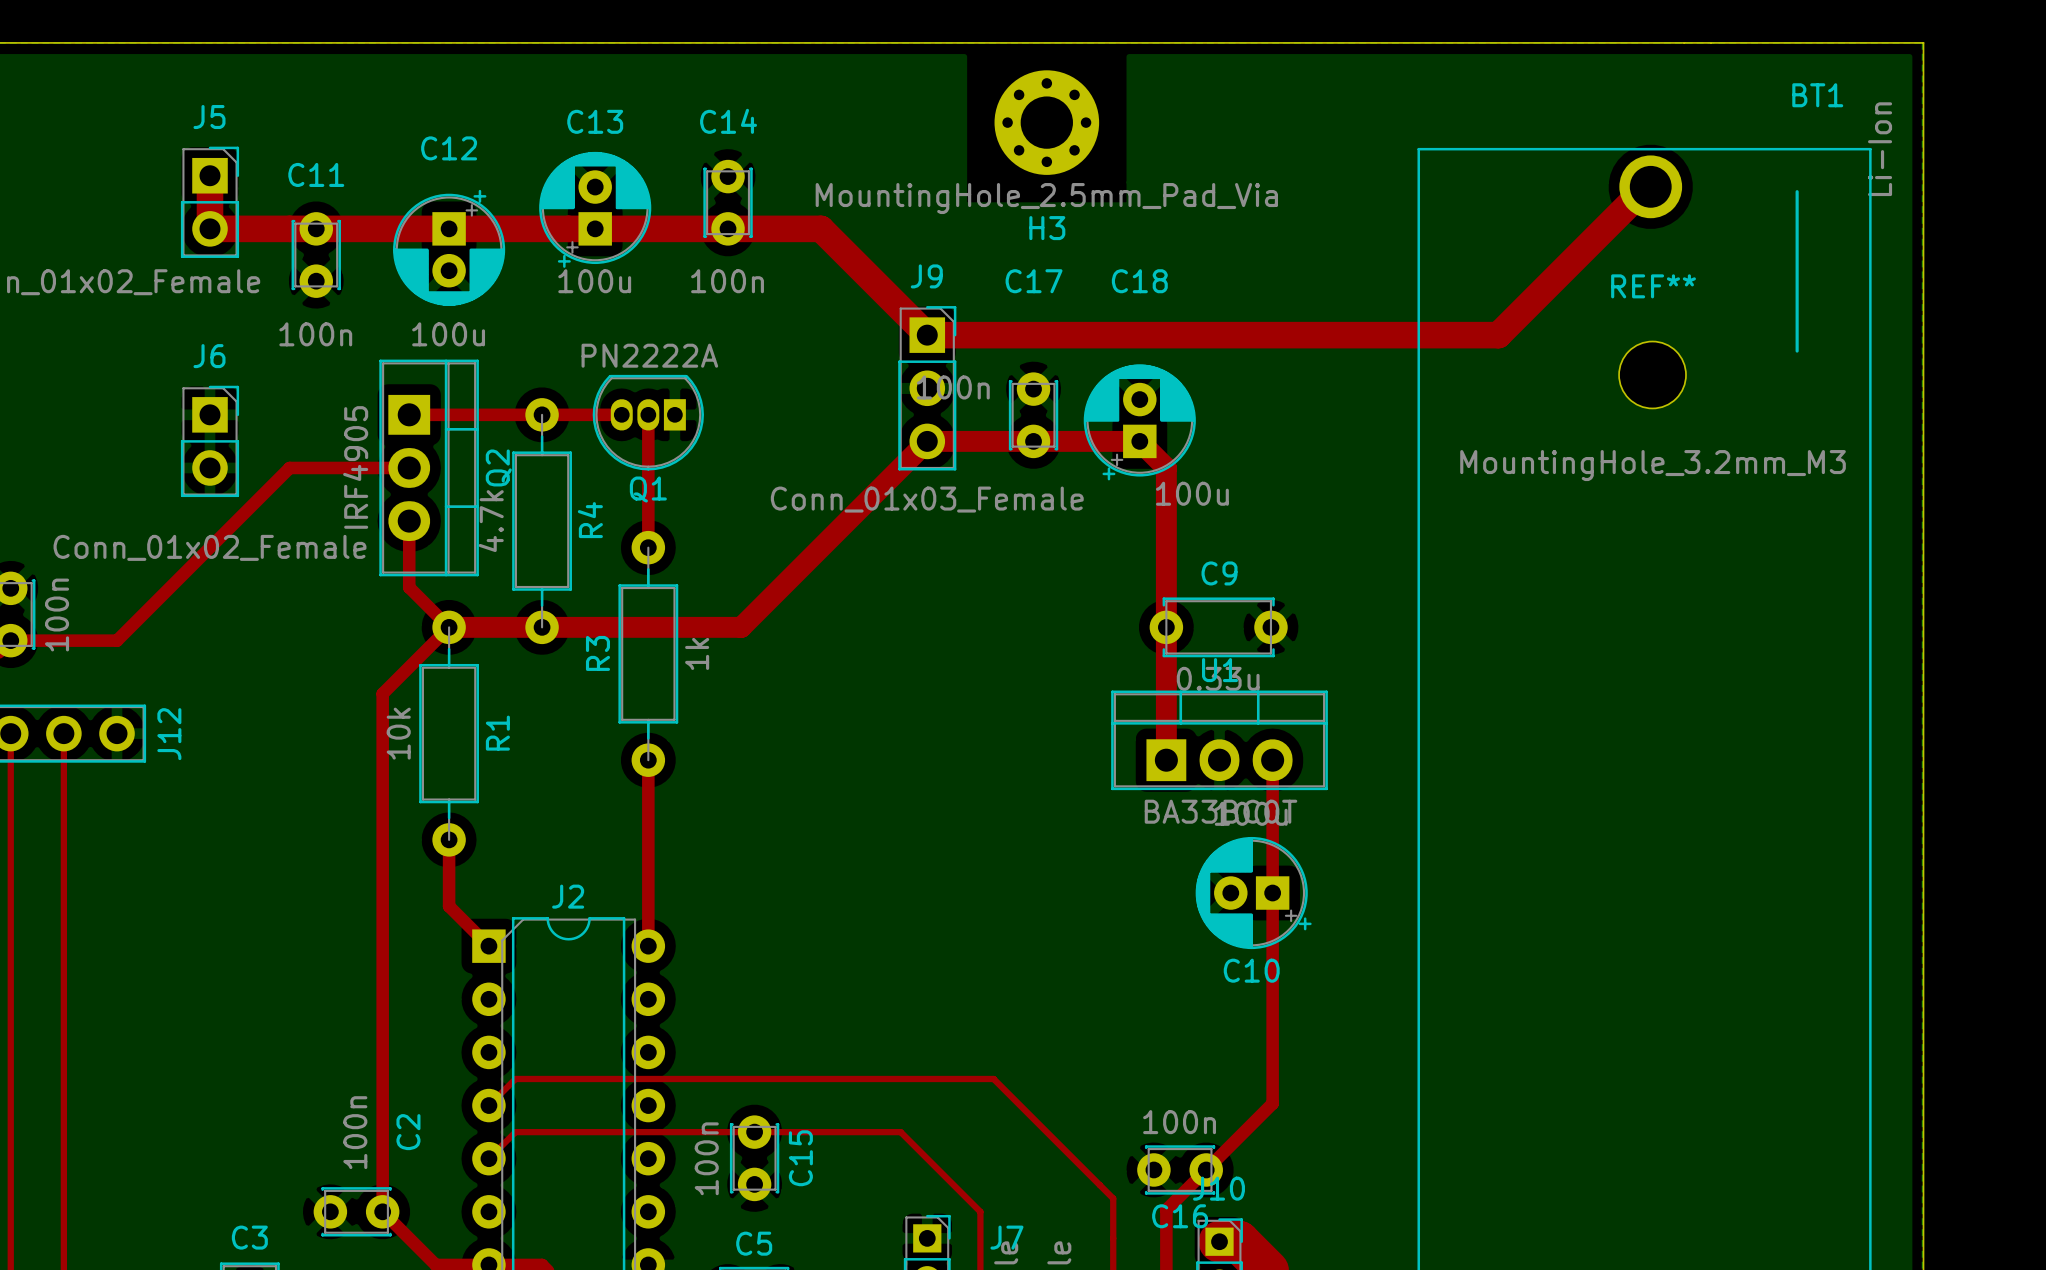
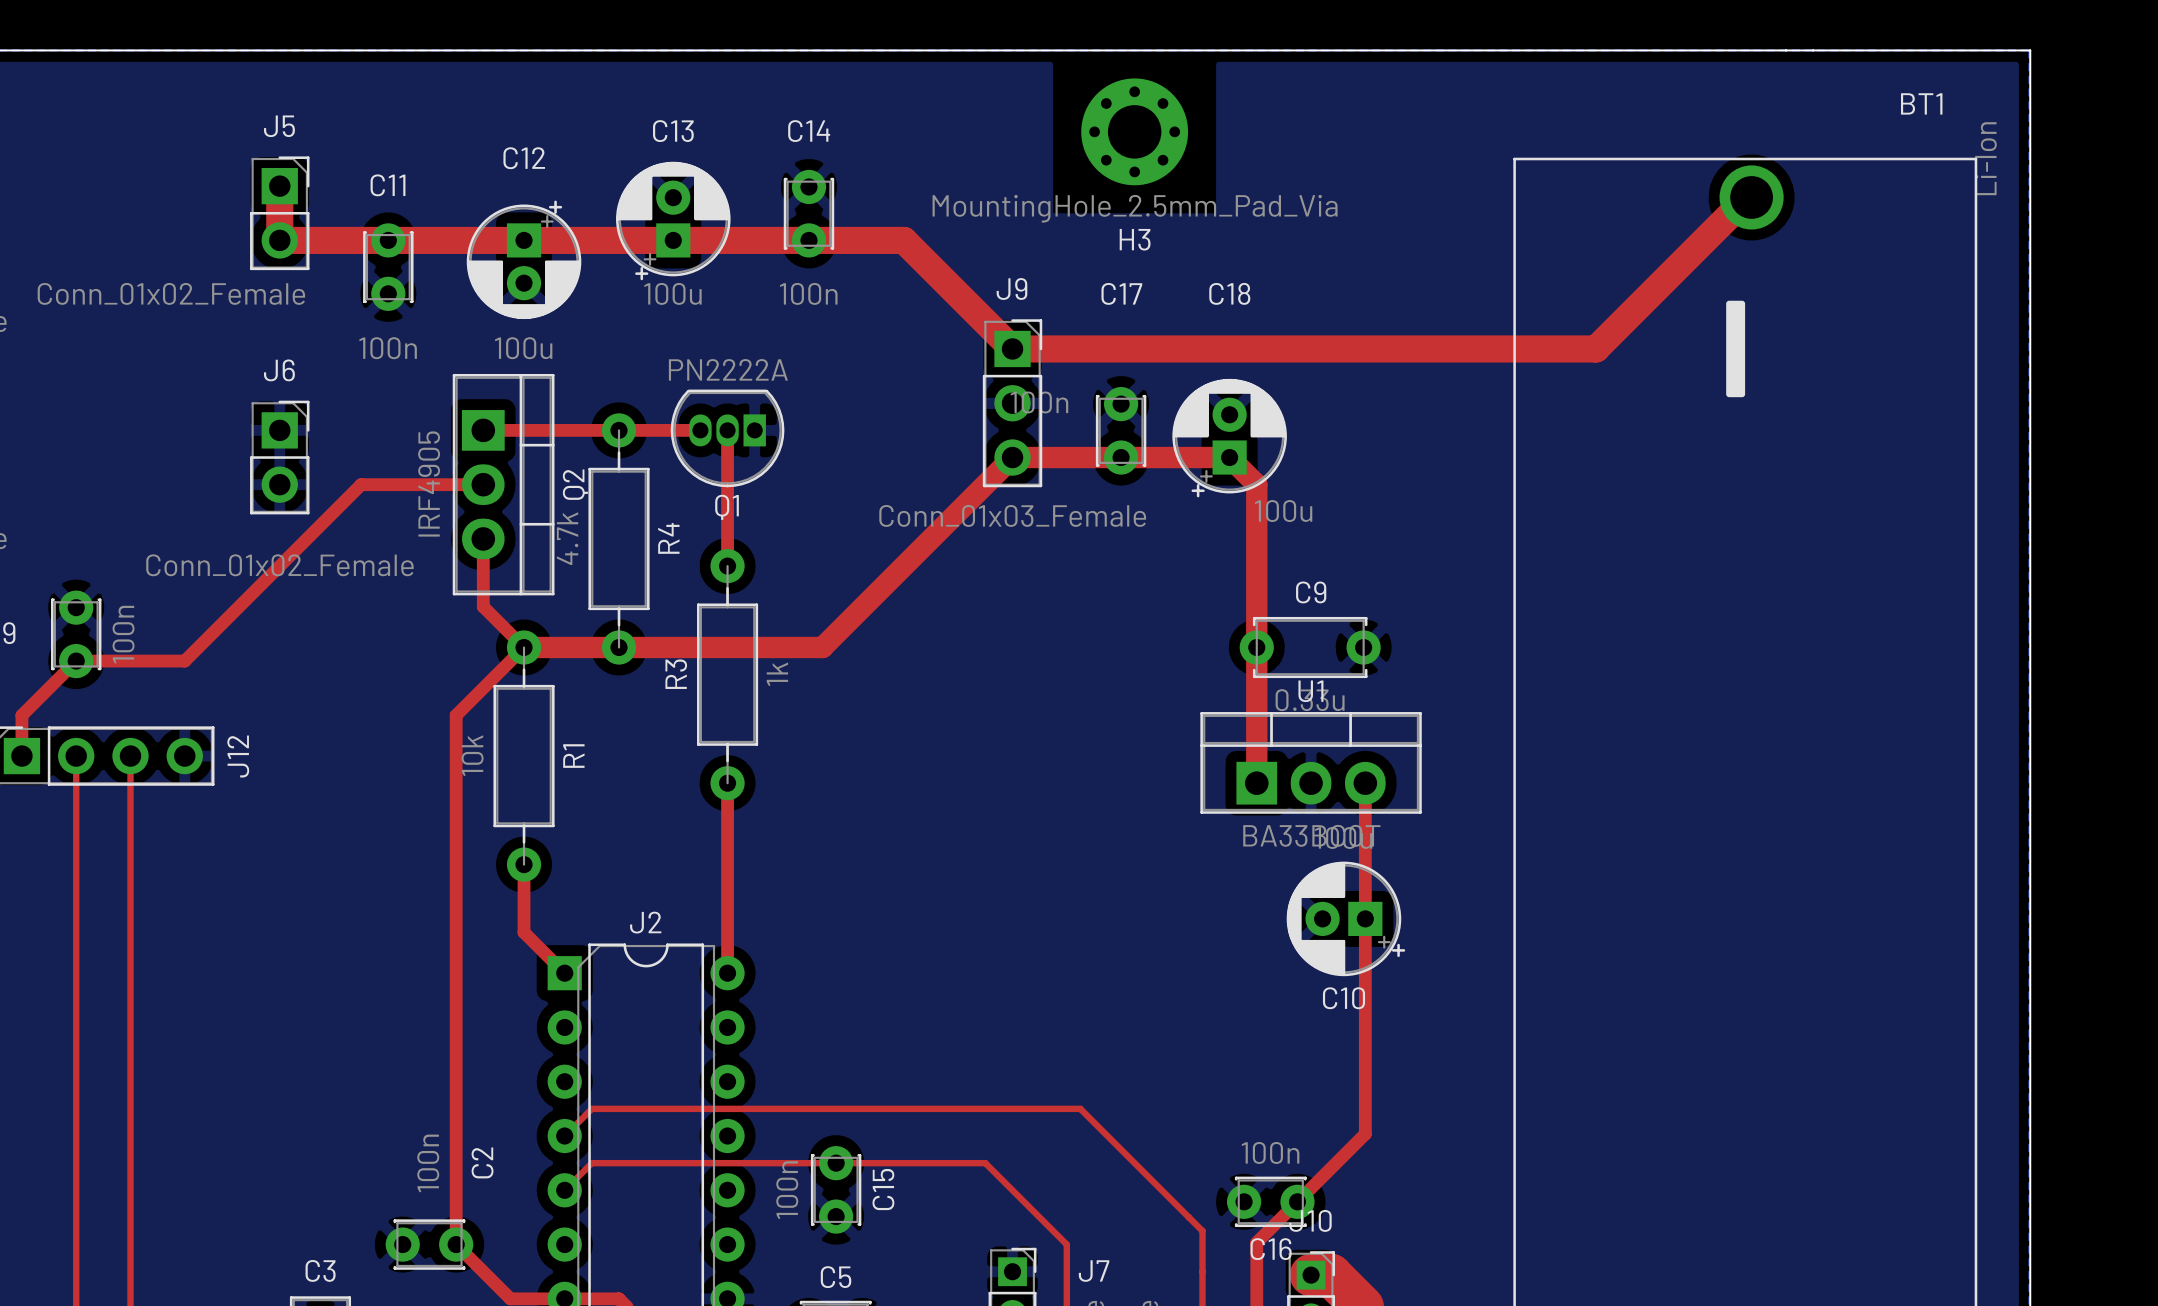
BT1 text position: - (1797, 271) -> - (1735, 348)
REF**: MountingHole_3.2mm_M3 (1652, 374) -> none

